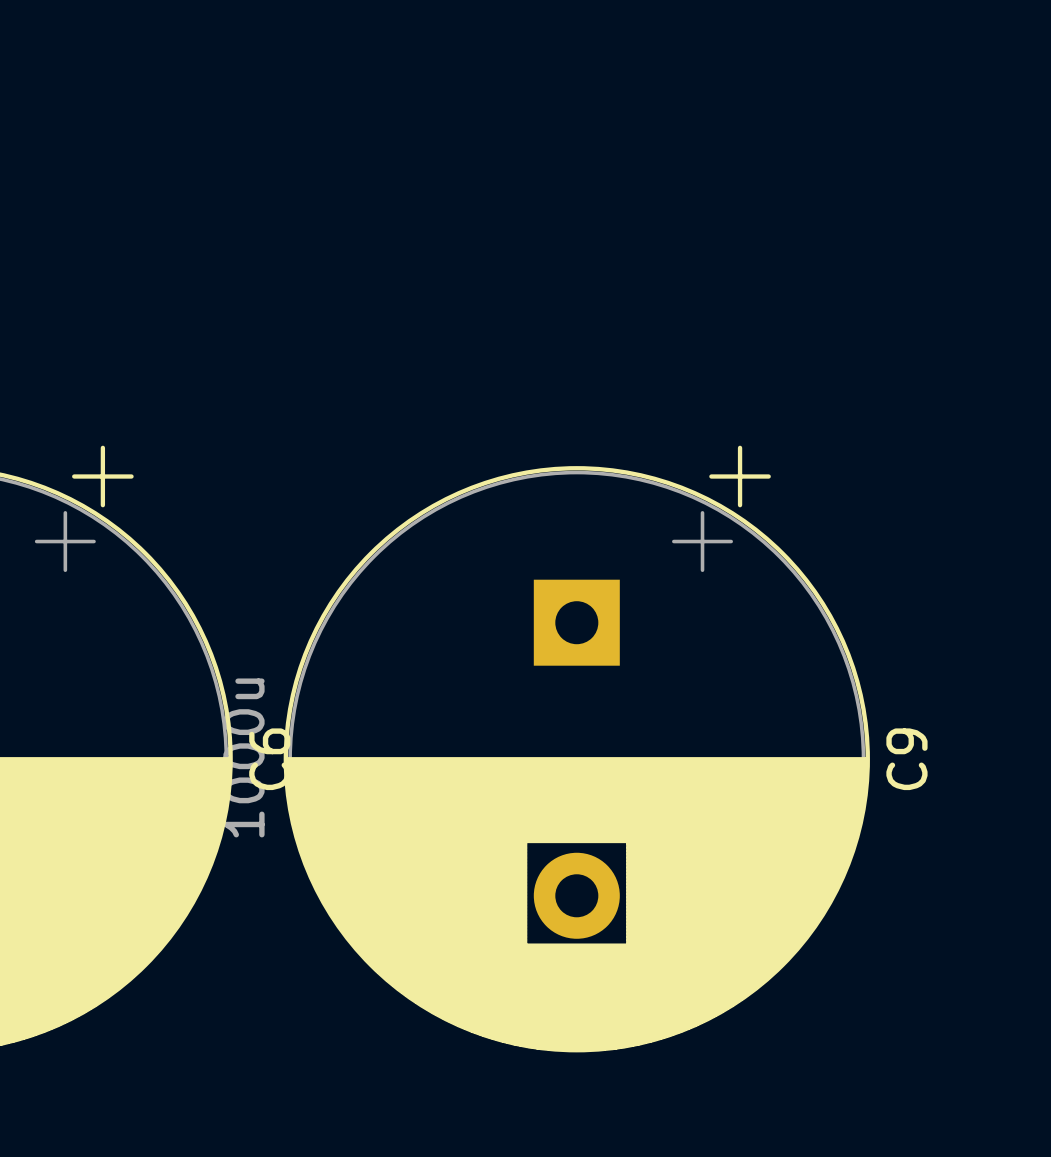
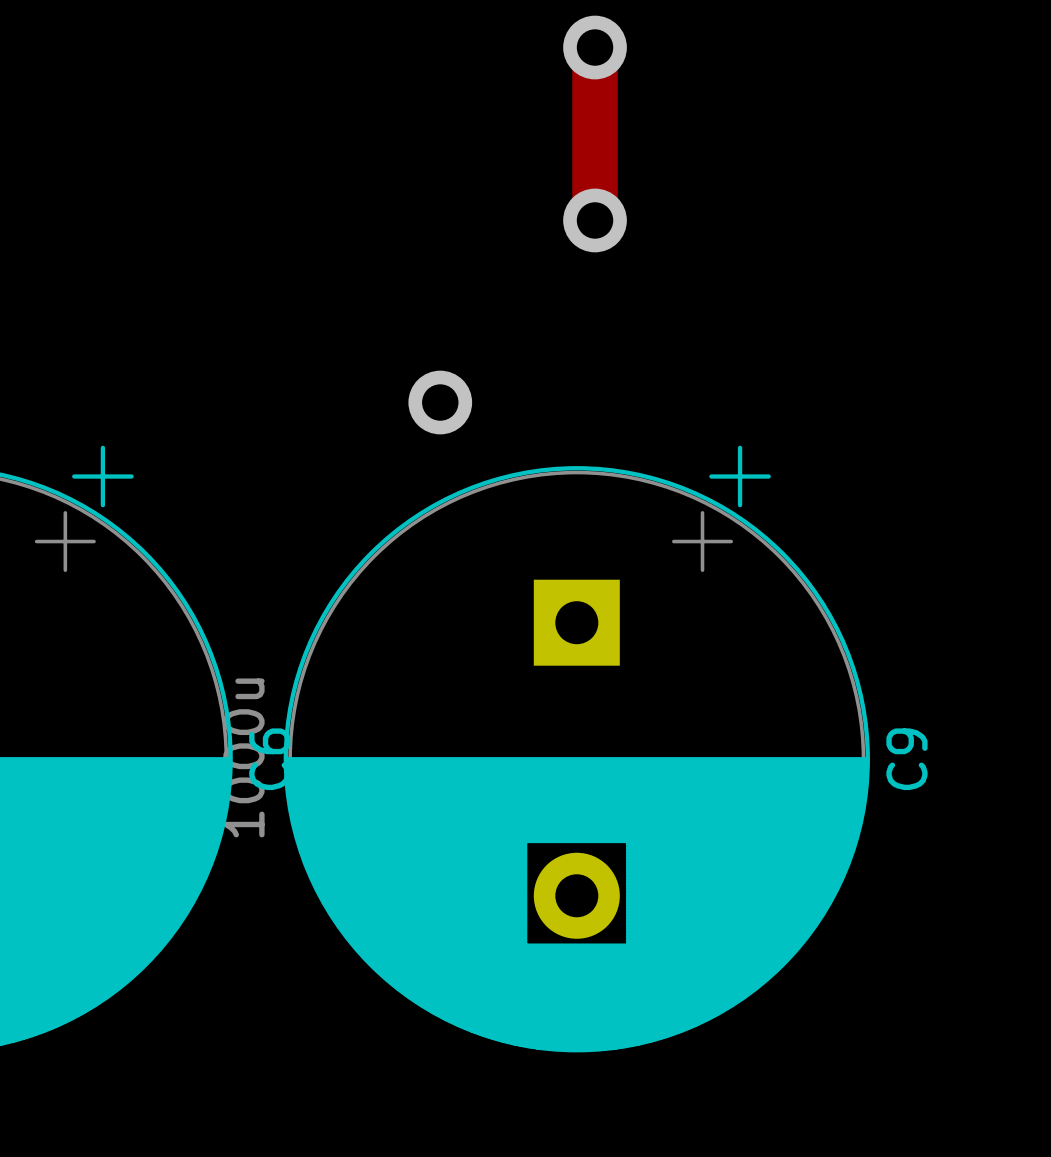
track: none -> (595, 47) (595, 220)
via: none -> (595, 47)
via: none -> (595, 220)
via: none -> (440, 402)

